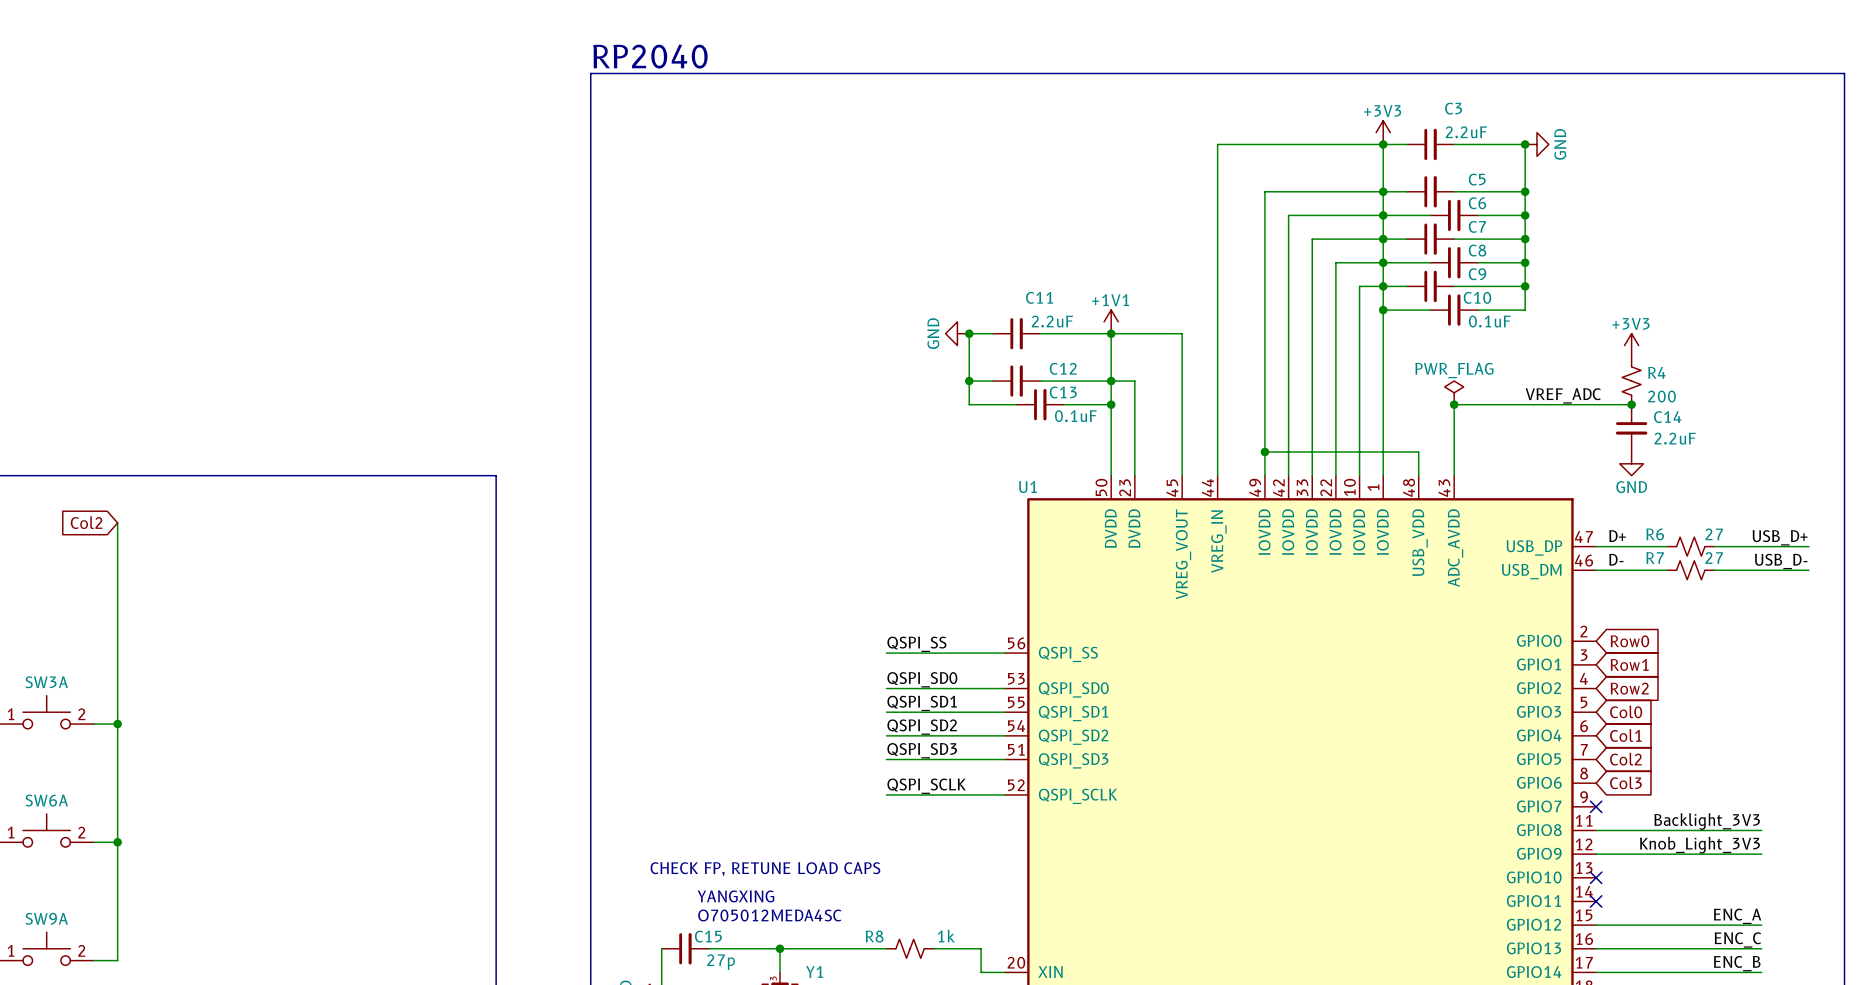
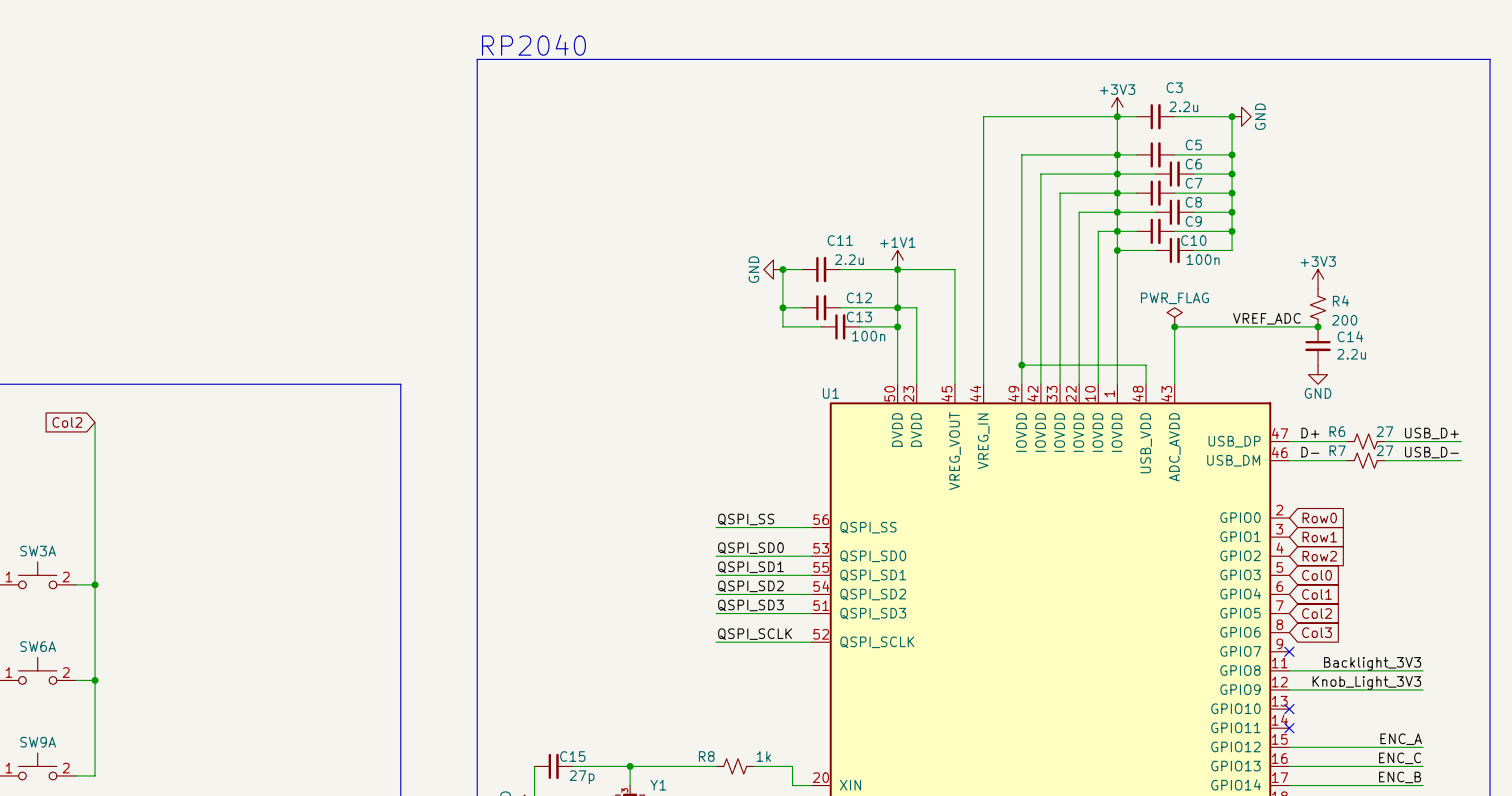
C3 value: 2.2uF (1466, 132) -> 2.2u (1183, 106)
C11 value: 2.2uF (1052, 321) -> 2.2u (849, 259)
C10 value: 0.1uF (1489, 321) -> 100n (1203, 259)
C13 value: 0.1uF (1075, 416) -> 100n (868, 336)
C14 value: 2.2uF (1675, 438) -> 2.2u (1351, 354)
text: CHECK FP, RETUNE LOAD CAPS (765, 869) -> none
text: YANGXING (735, 896) -> none
text: O705012MEDA4SC (769, 915) -> none

